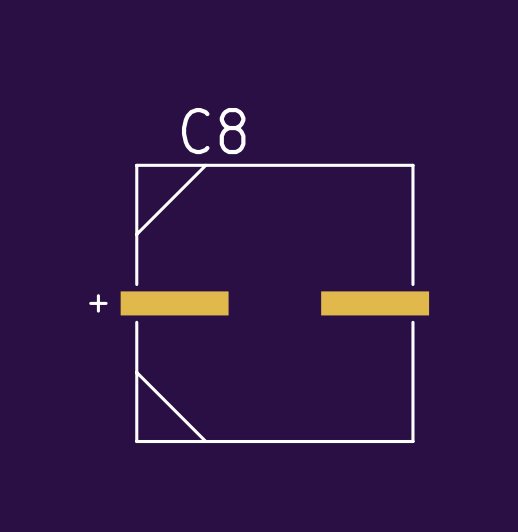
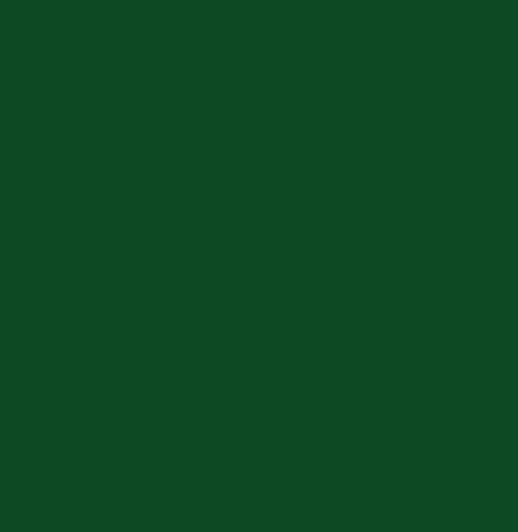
C8: (259, 303) -> none

